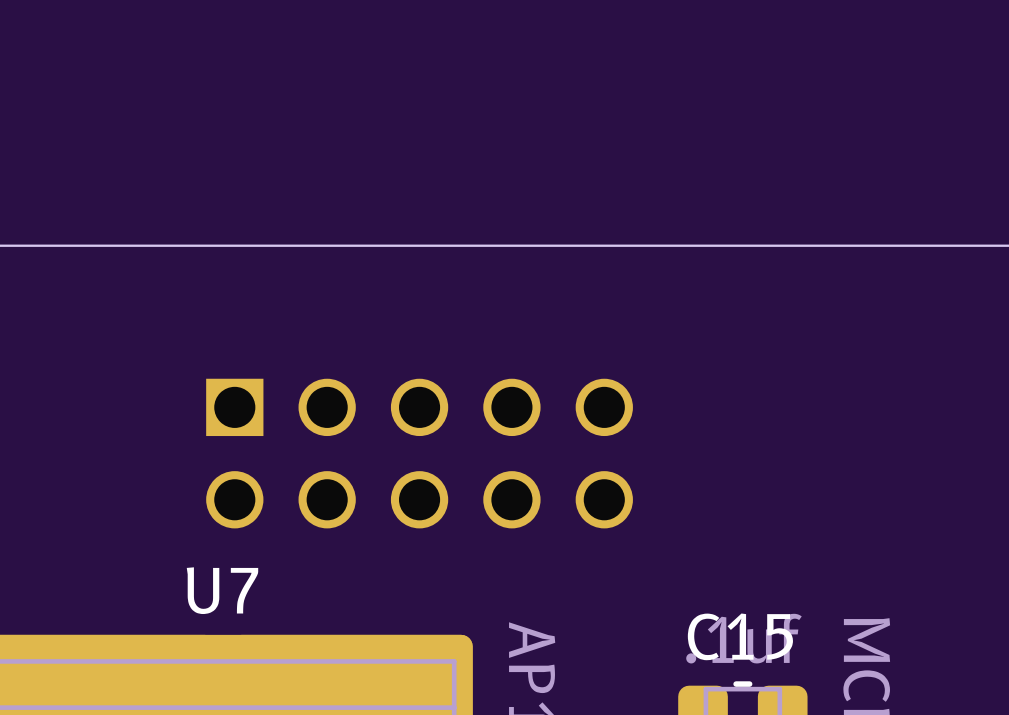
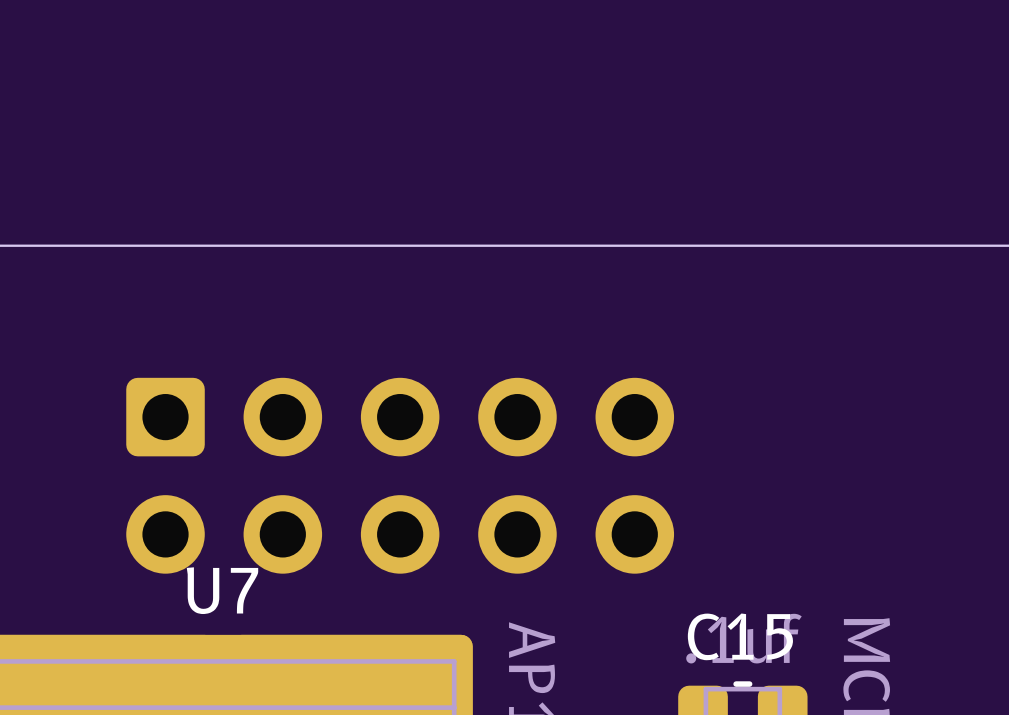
part footprint: [206, 378, 633, 529] -> [126, 377, 675, 574]

